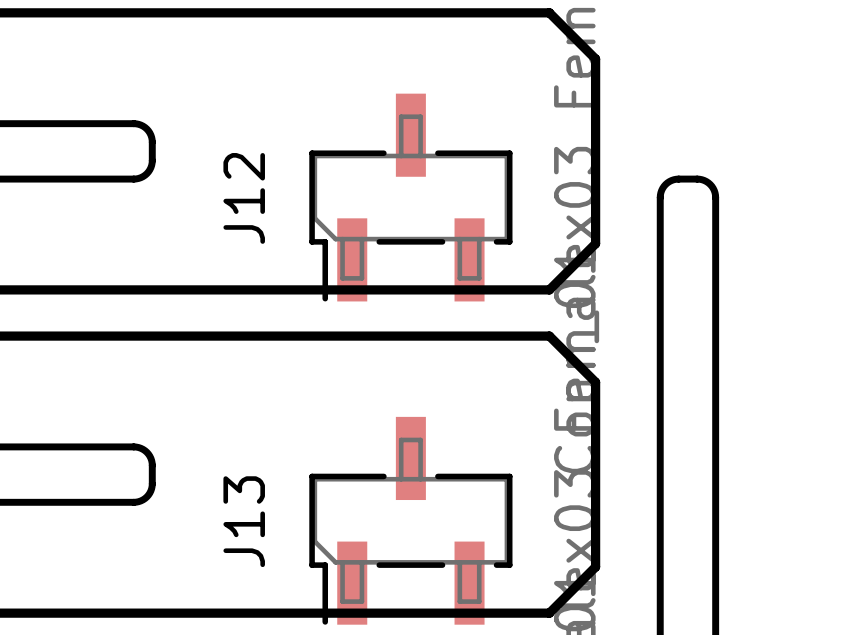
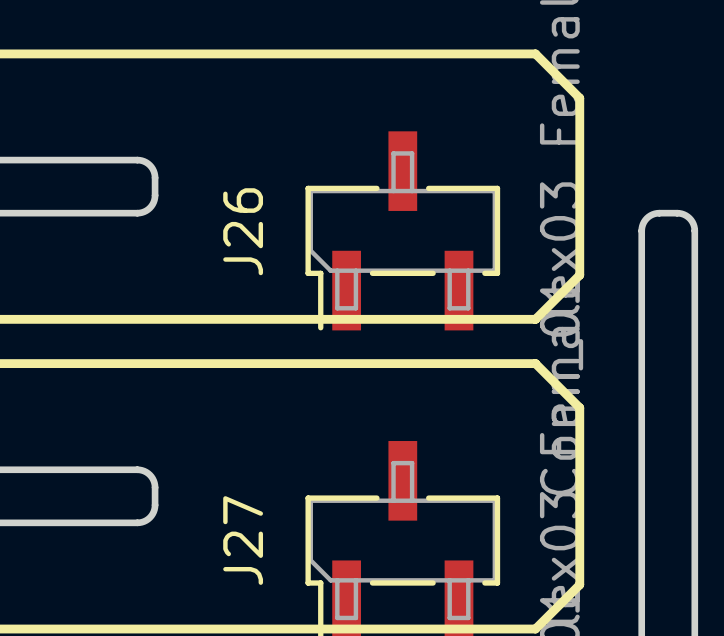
J12 name: J12 (244, 198) -> J26 (243, 231)
J13 name: J13 (244, 521) -> J27 (243, 540)

